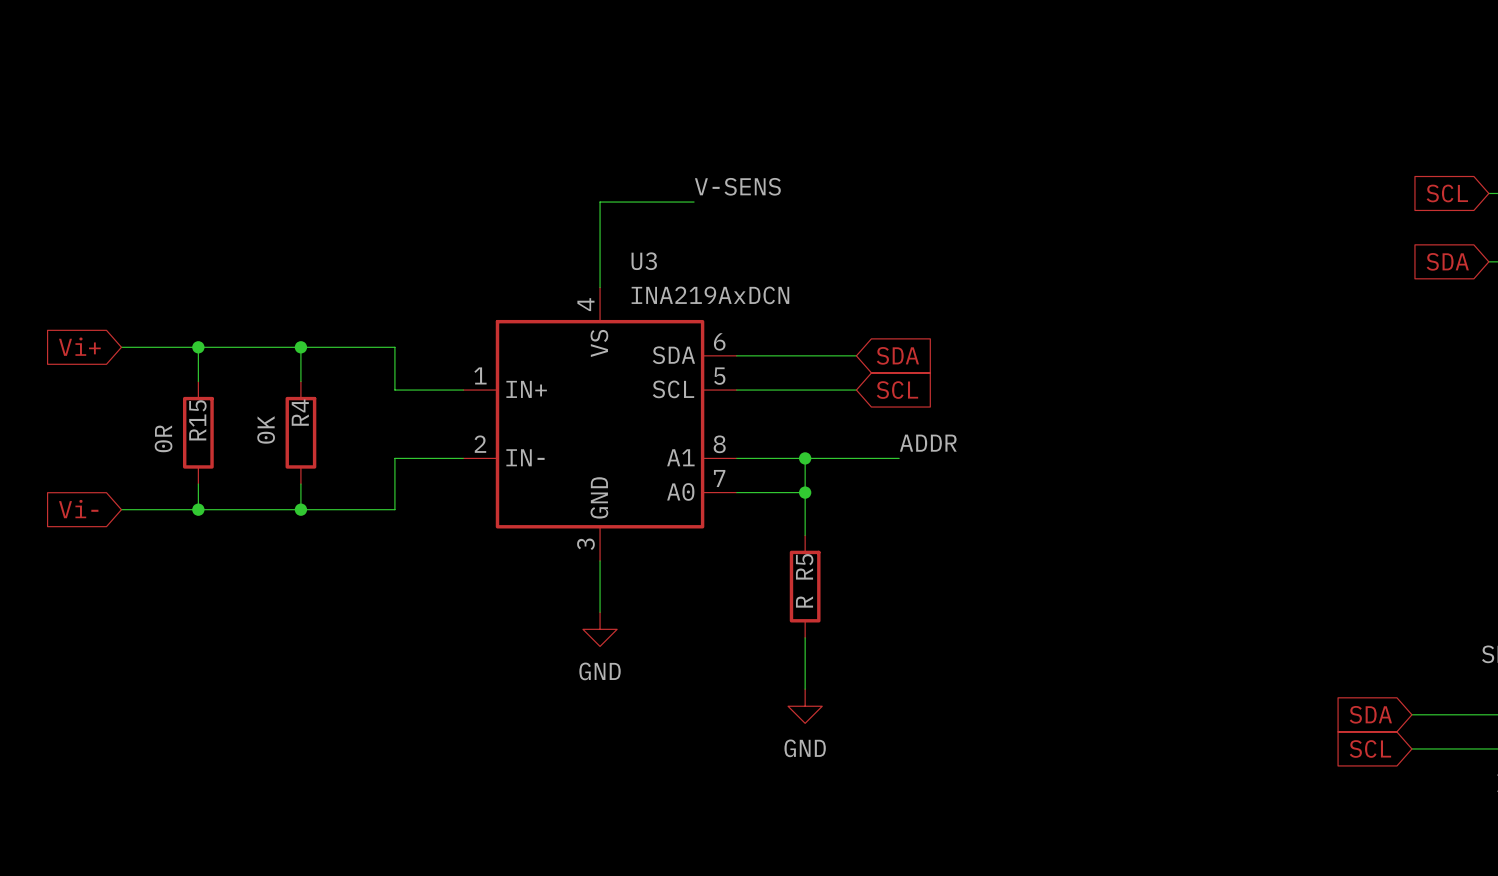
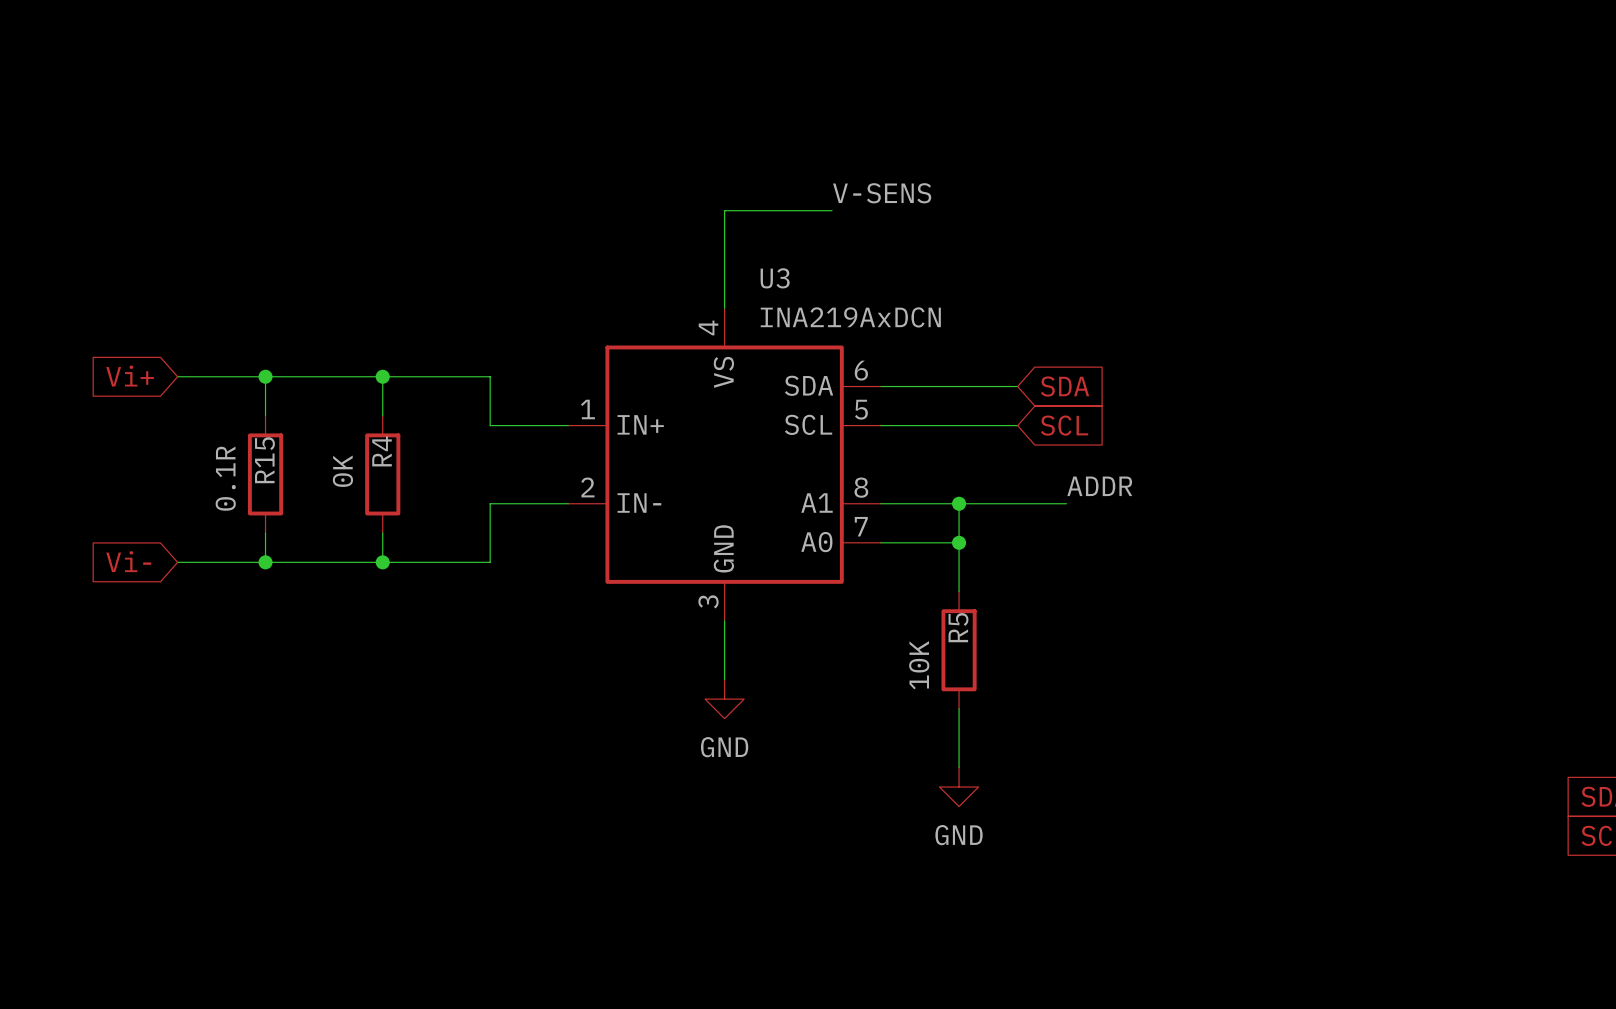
R15 value: 0R (163, 438) -> 0.1R (225, 478)
R5 value: R (804, 602) -> 10K (919, 665)

